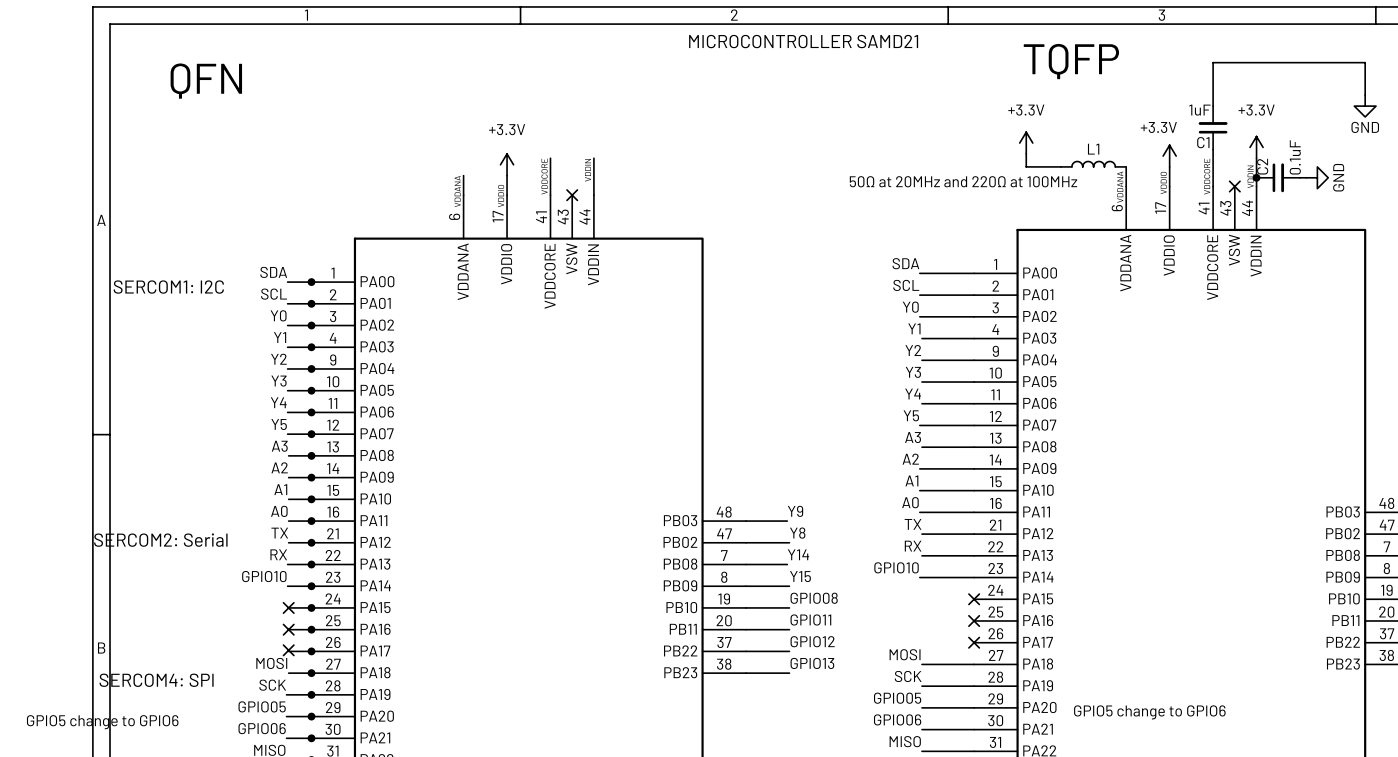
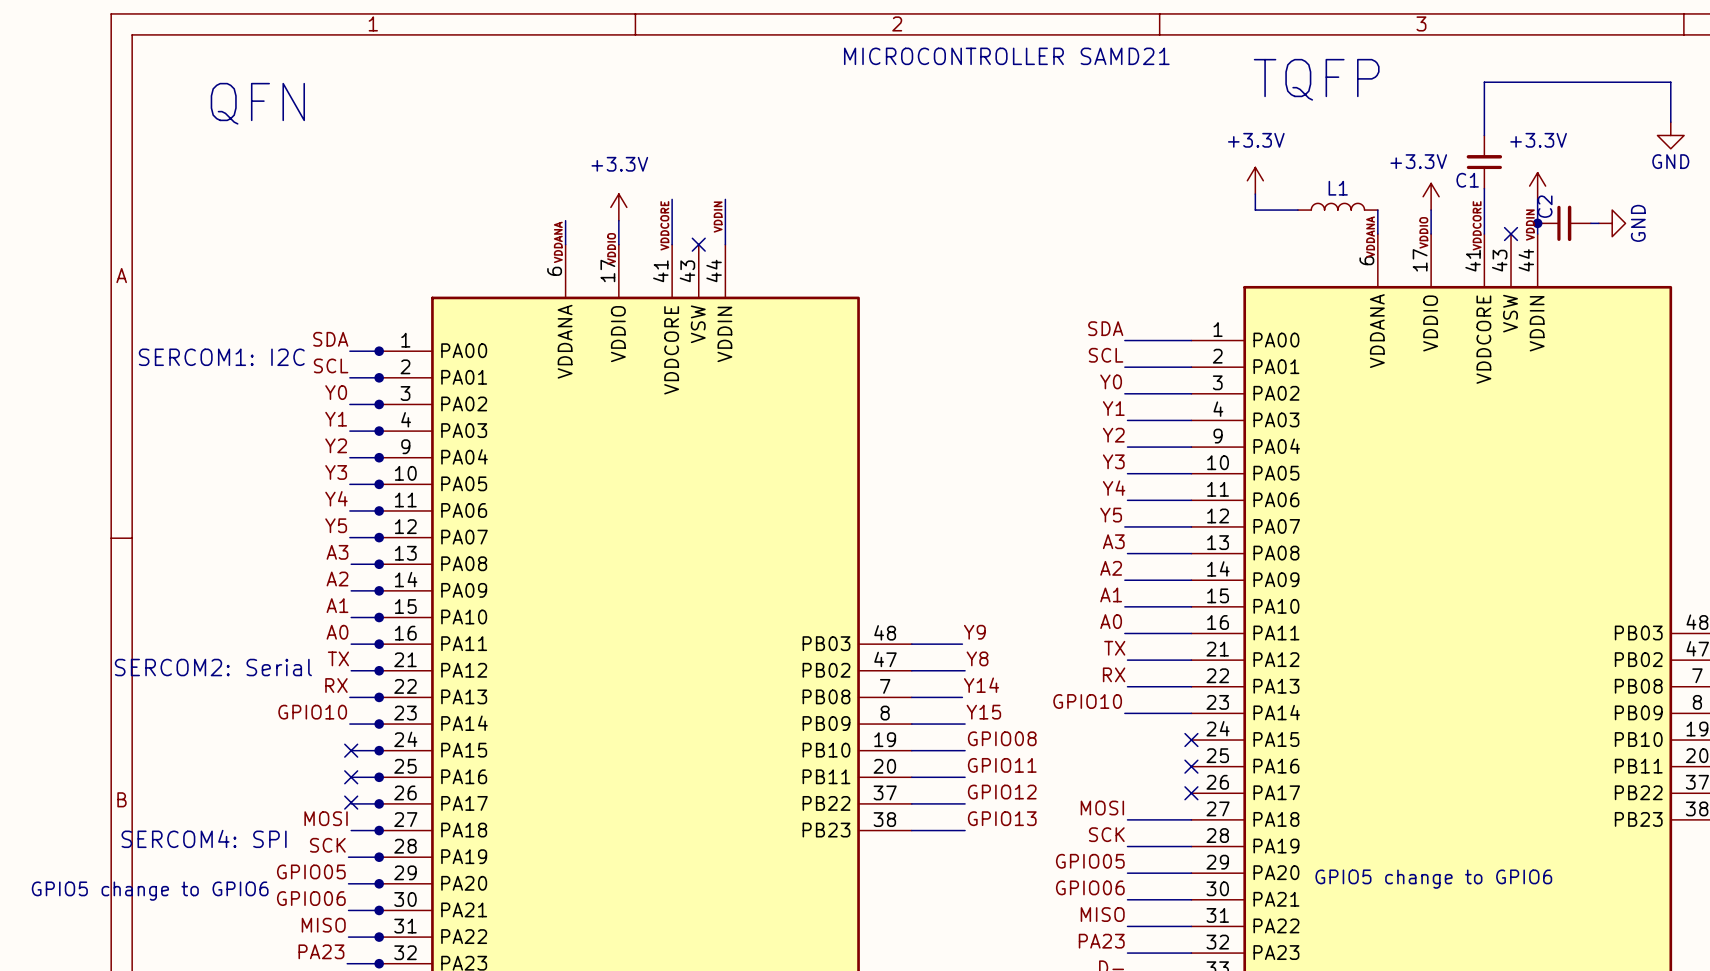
C1 value: 1uF (1199, 110) -> none
C2 value: 0.1uF (1295, 157) -> none
L1 value: 50Ω at 20MHz and 220Ω at 100MHz (963, 181) -> none

